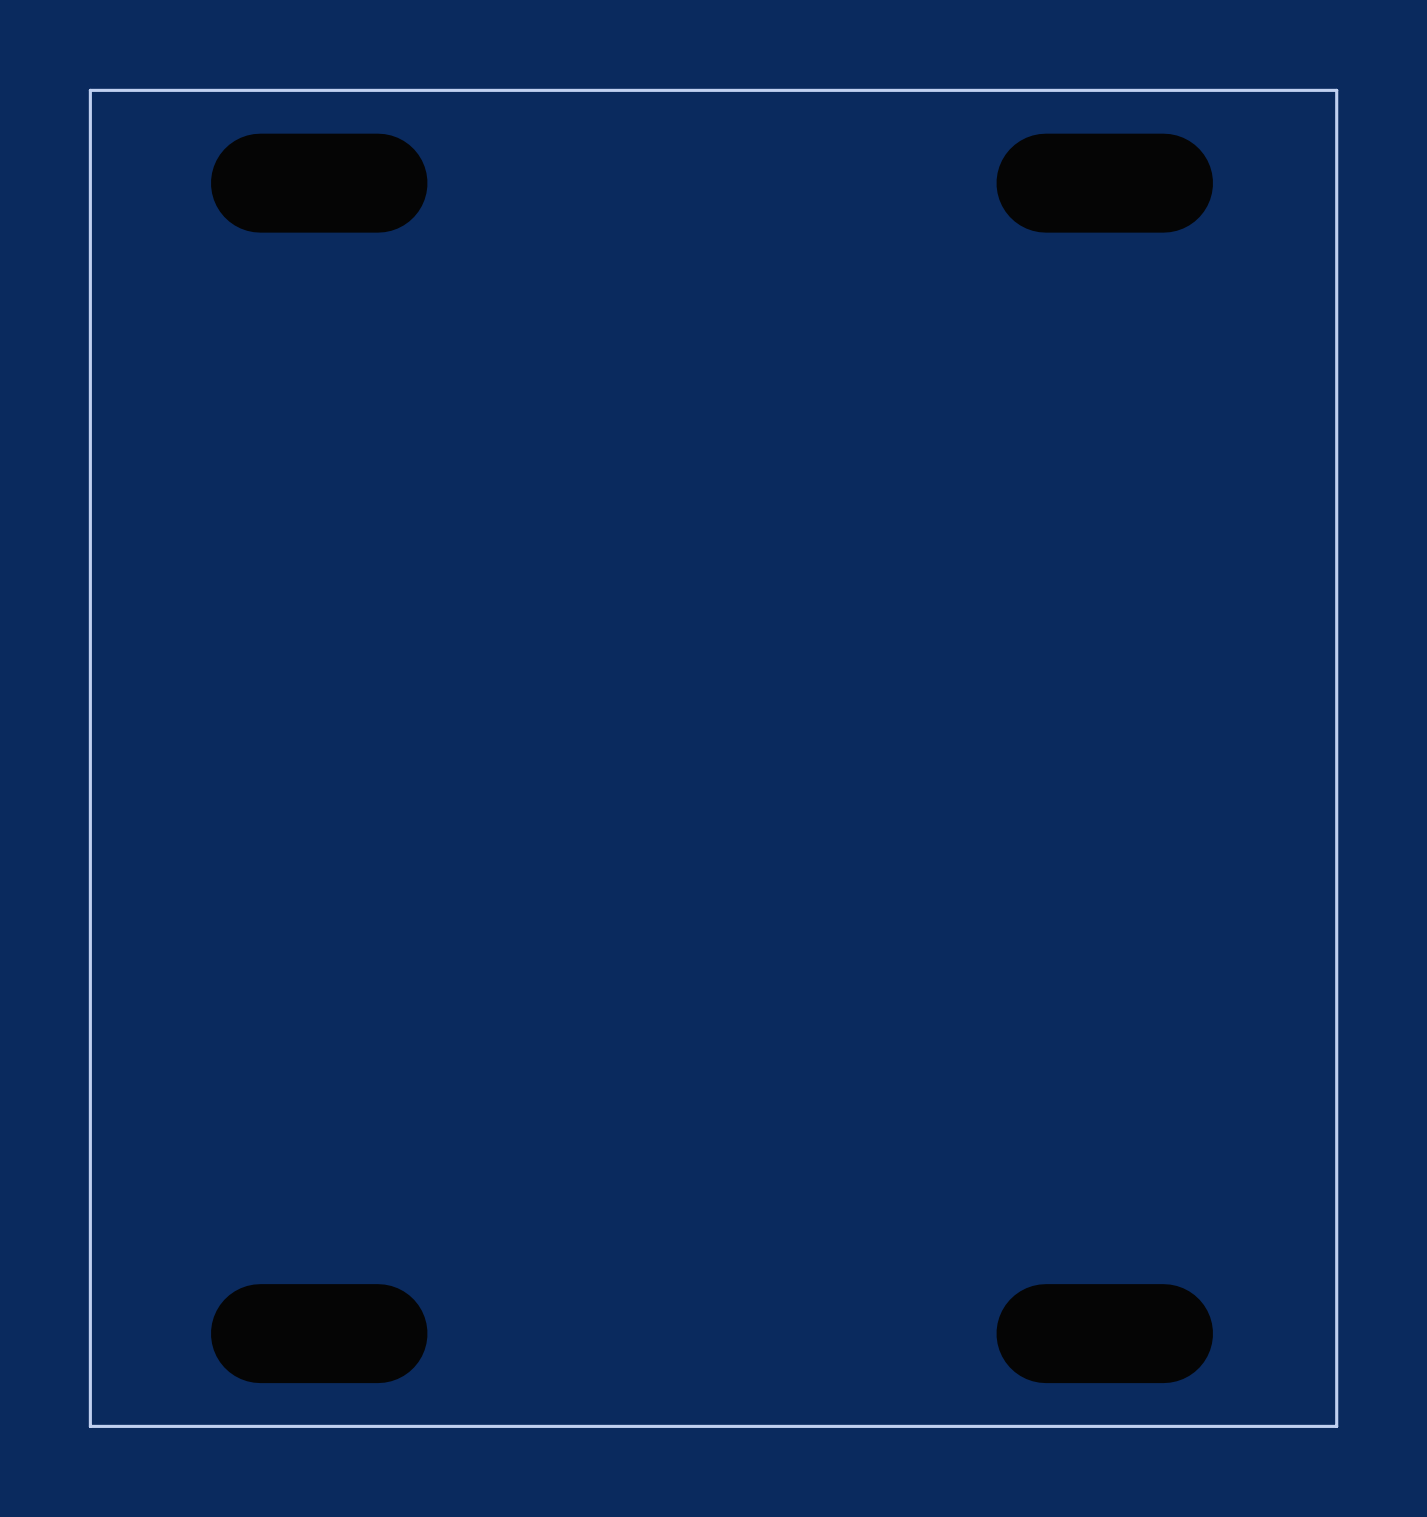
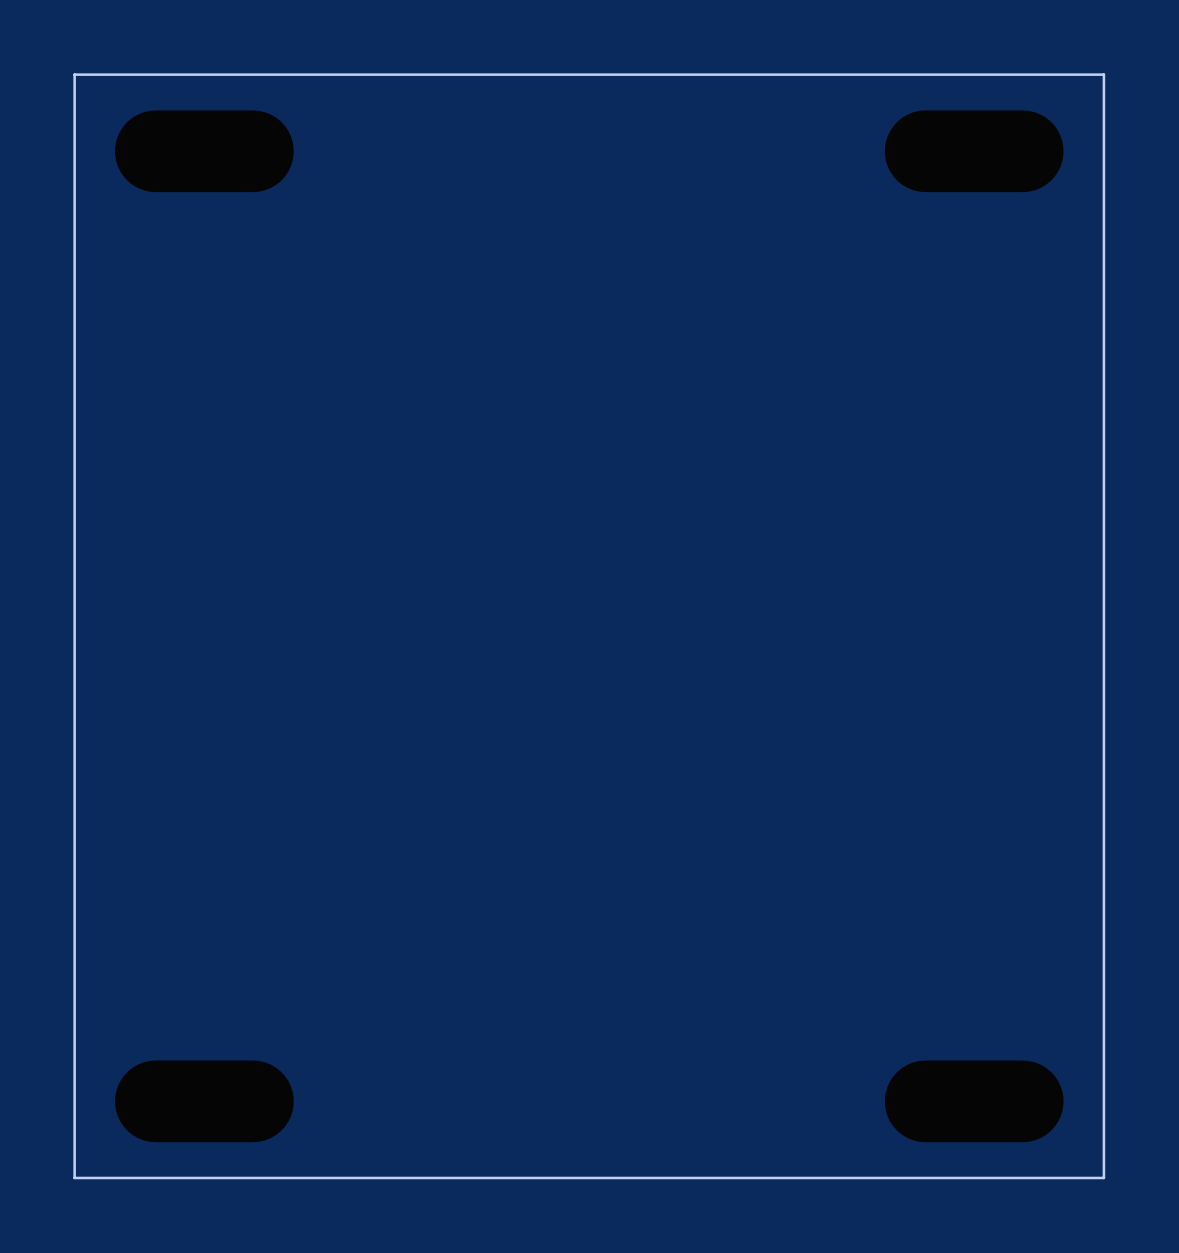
part position: (319, 183) -> (204, 151)
part position: (1104, 183) -> (974, 151)
part position: (319, 1333) -> (204, 1101)
part position: (1104, 1333) -> (974, 1101)

